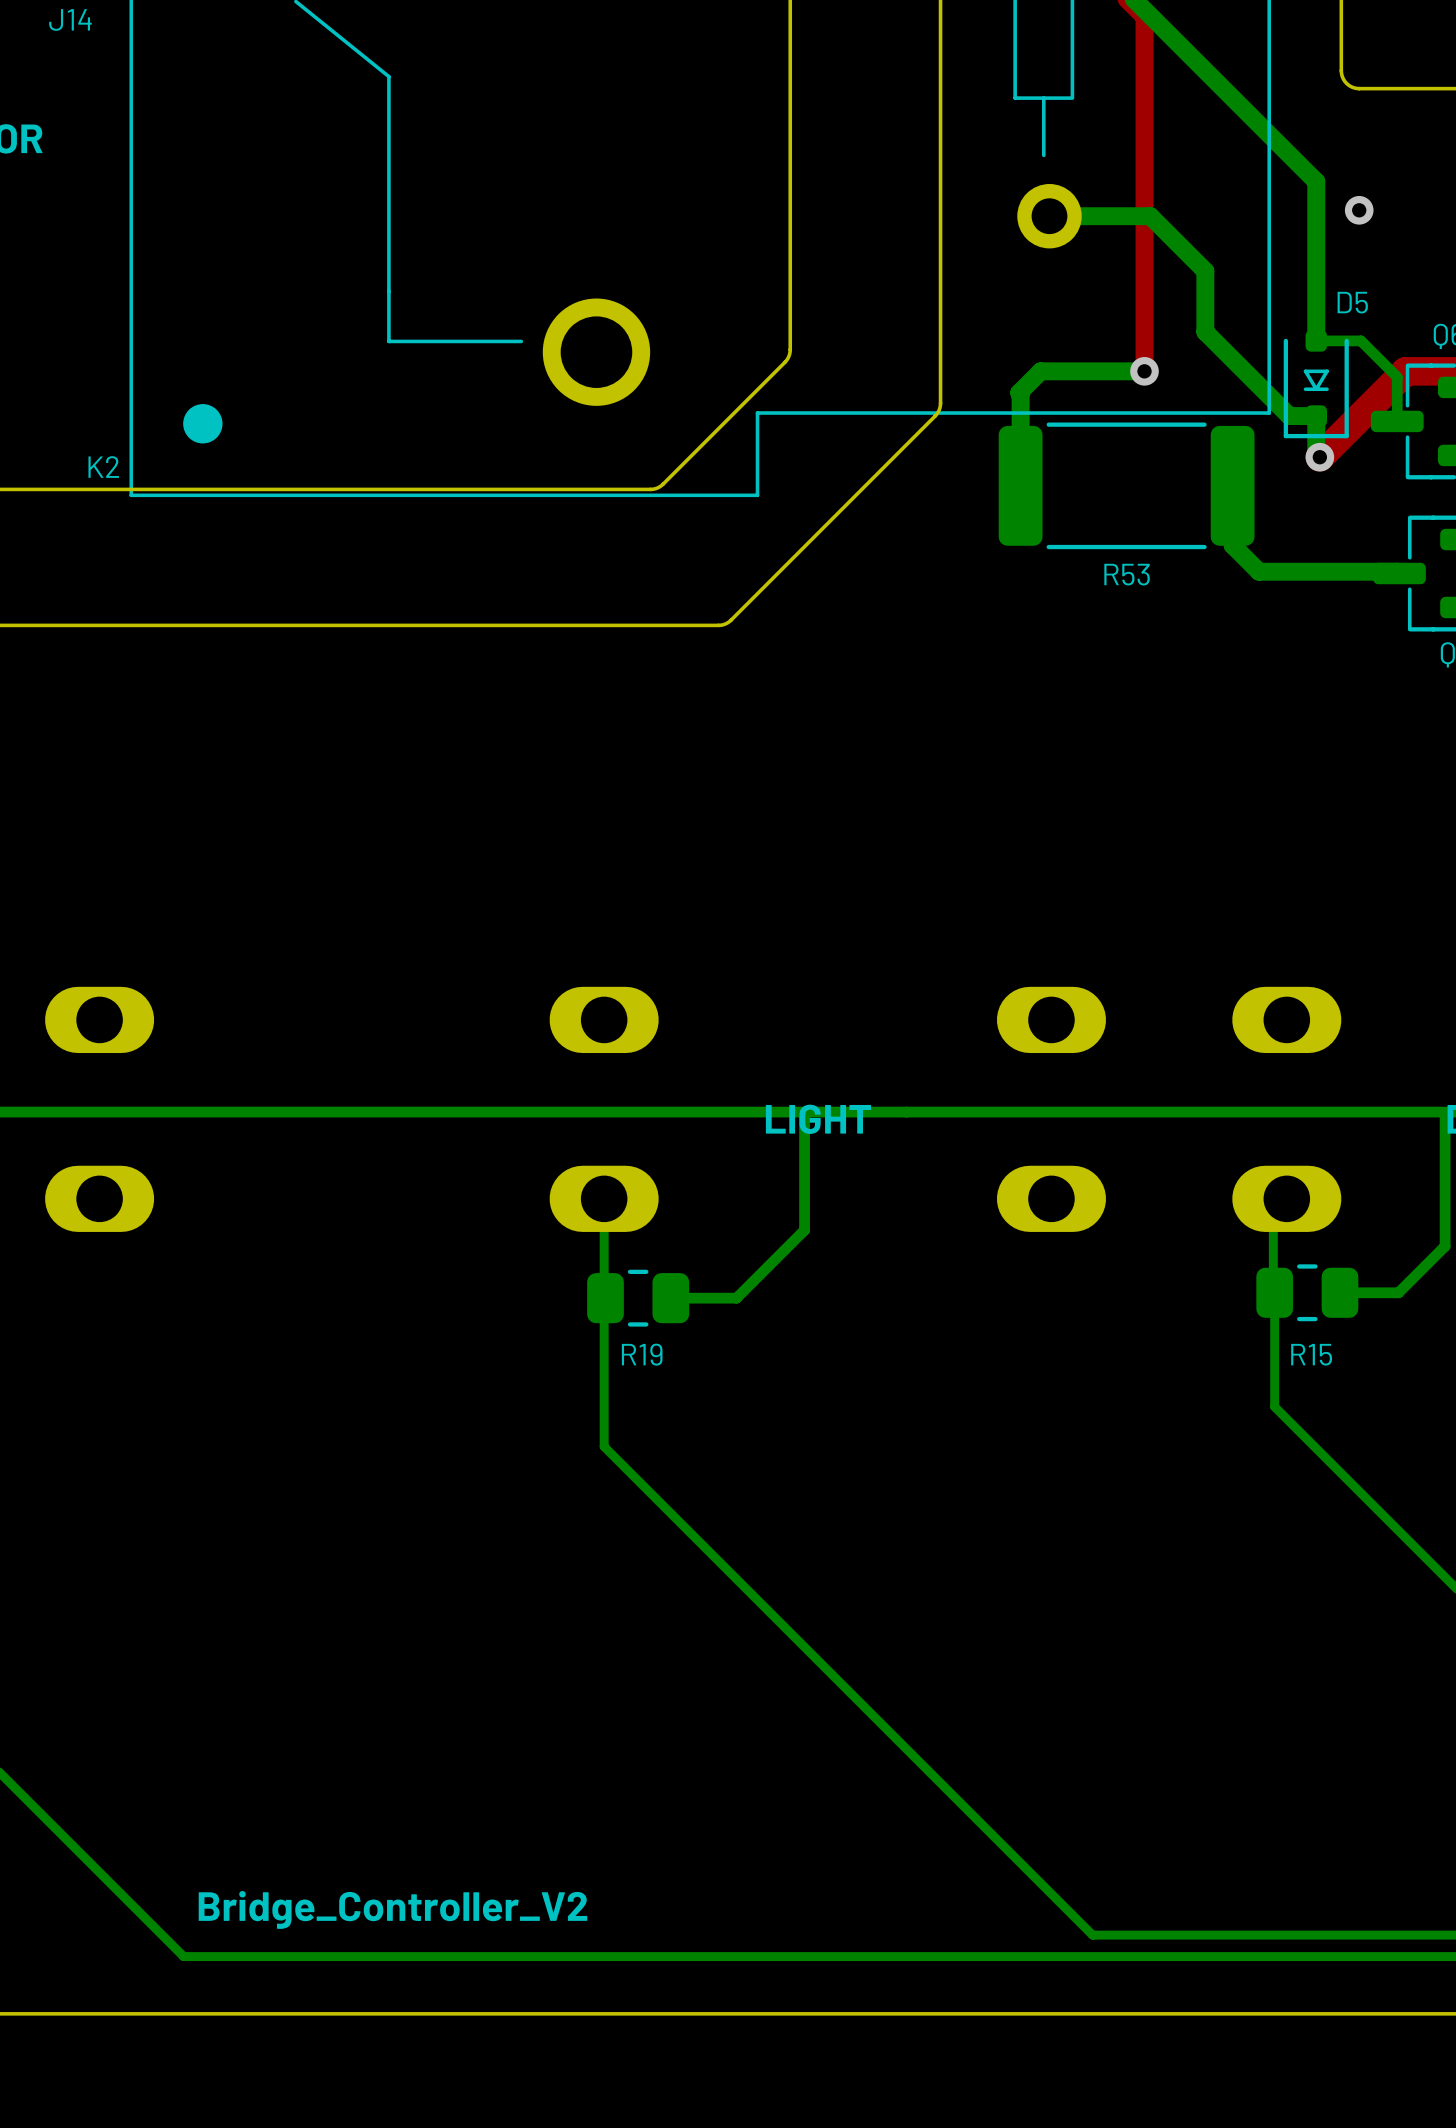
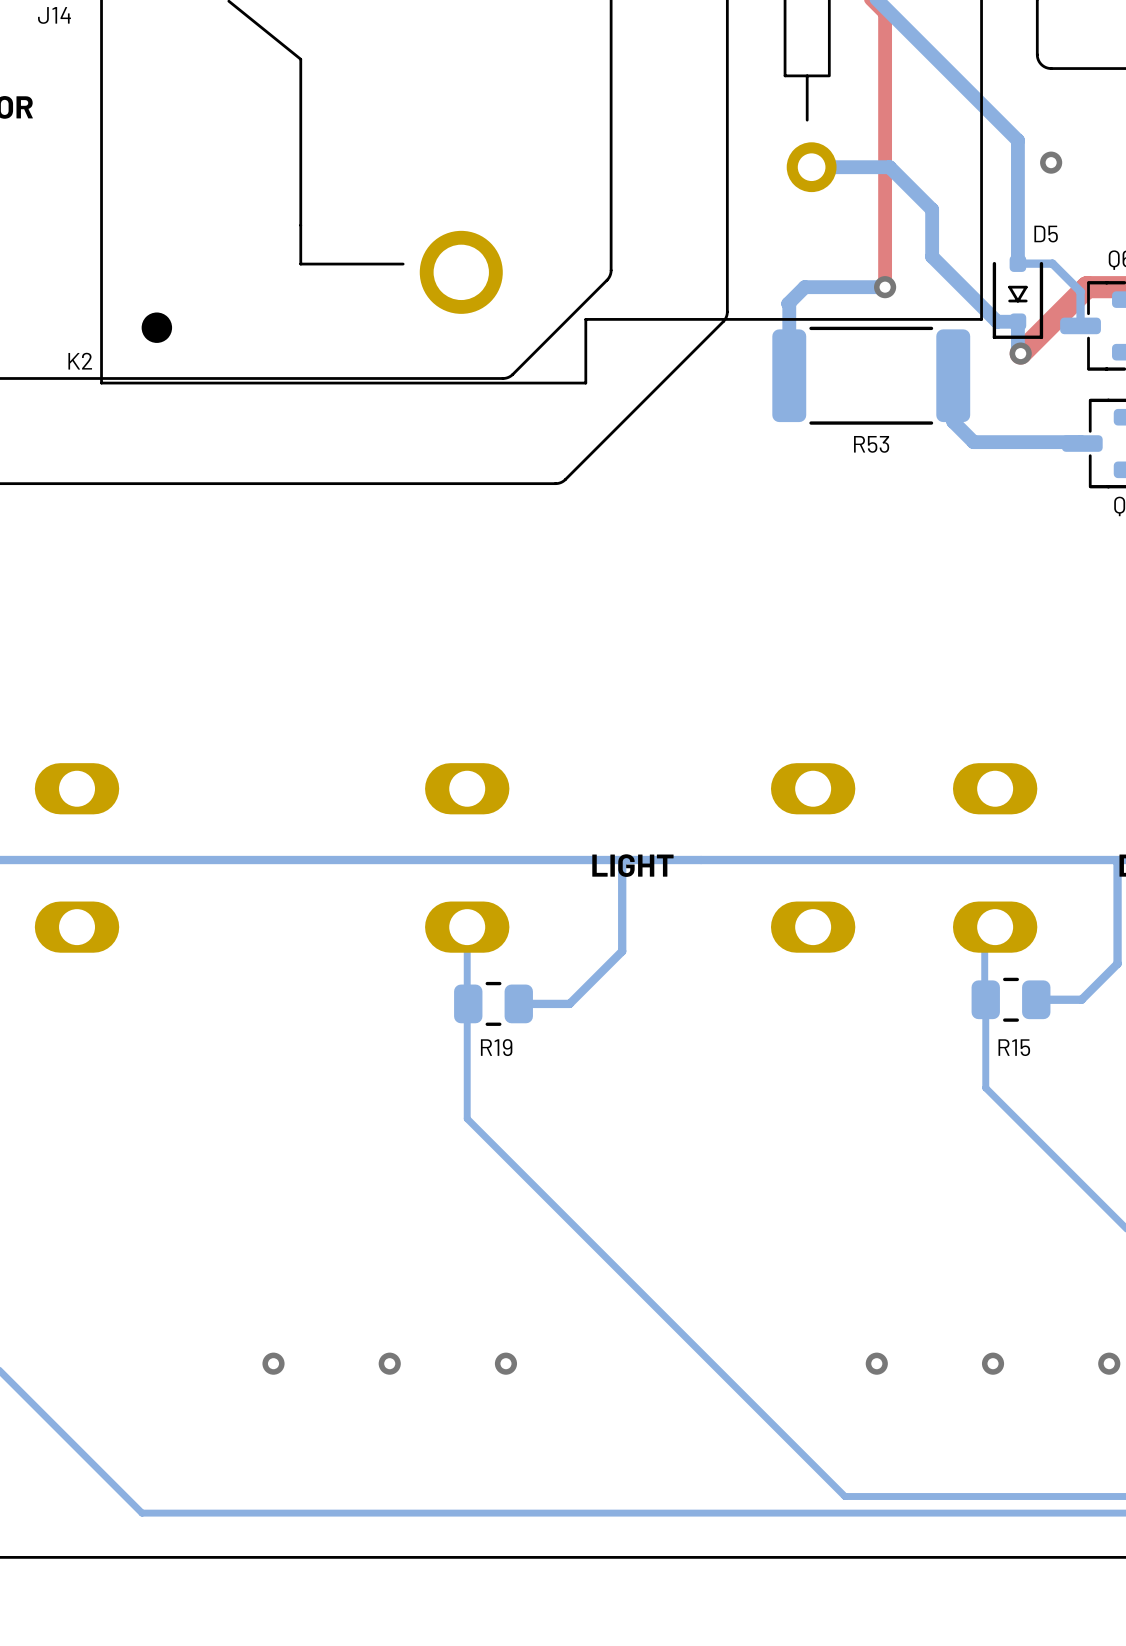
via: none -> (273, 1363)
via: none -> (389, 1363)
via: none -> (505, 1363)
via: none -> (876, 1363)
via: none -> (993, 1363)
via: none -> (1109, 1363)
text: Bridge_Controller_V2 (392, 1909) -> none

